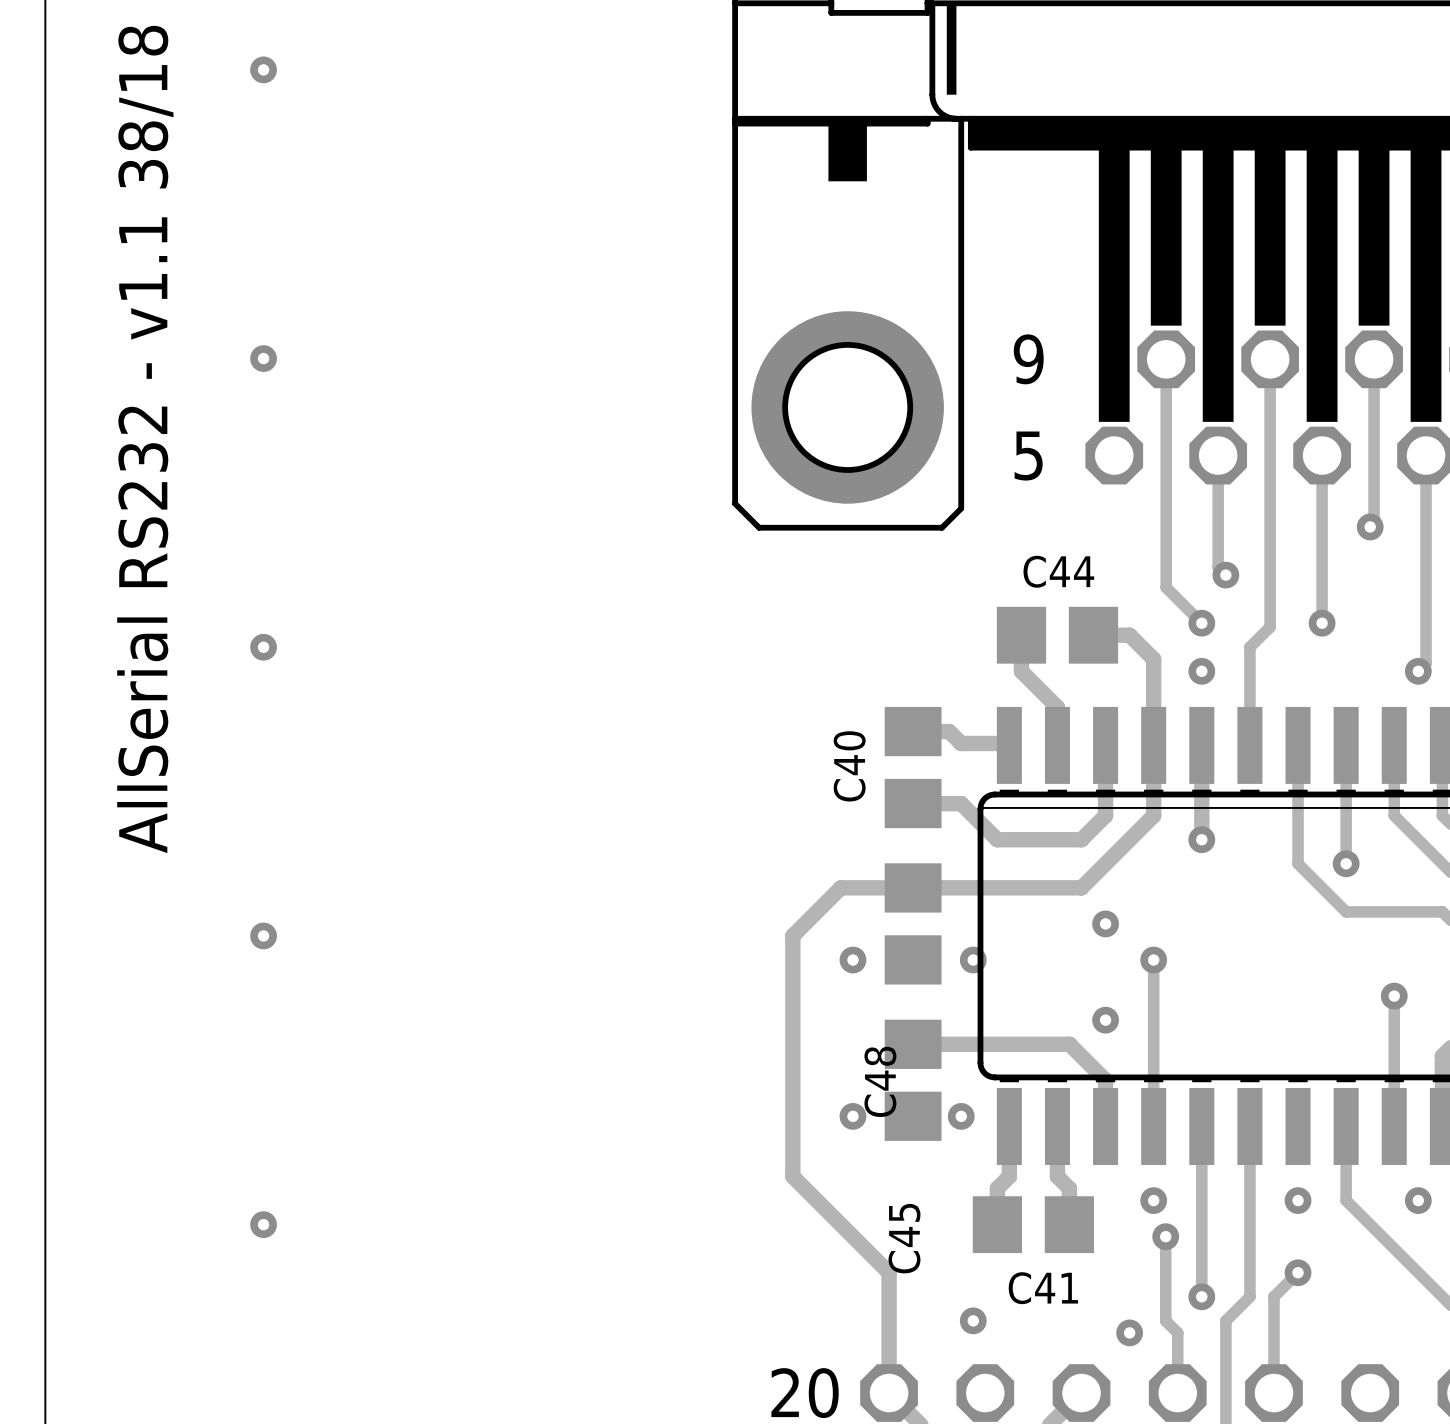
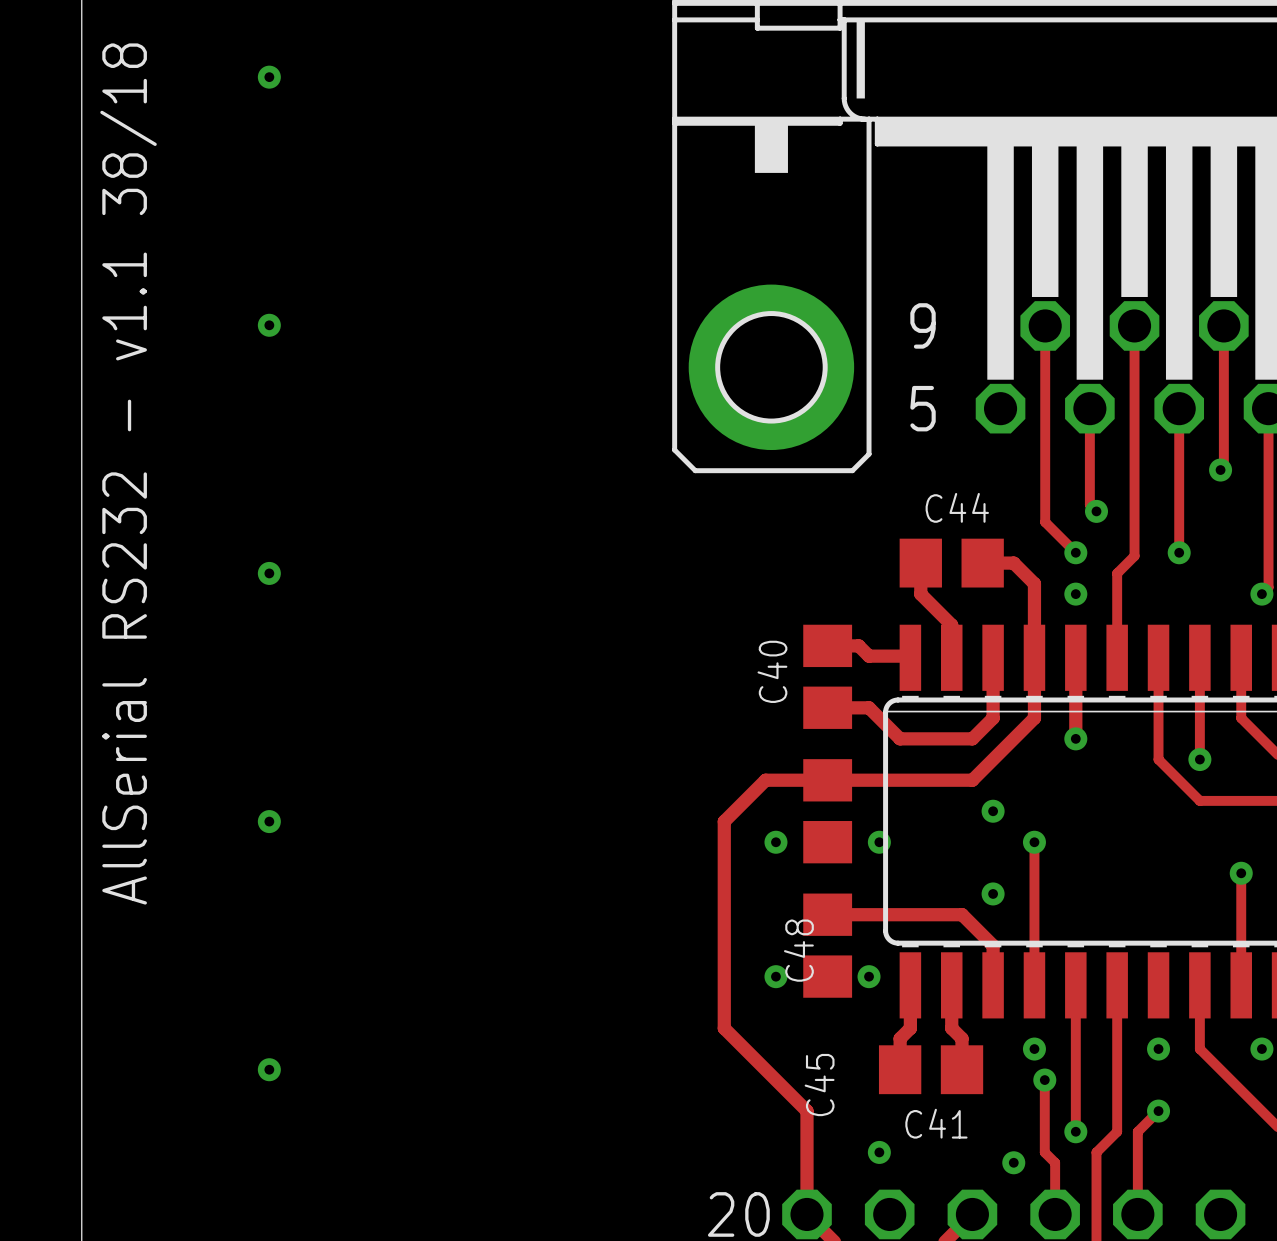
text position: AllSerial RS232 - v1.1 38/18 (145, 439) -> AllSerial RS232 - v1.1 38/18 (128, 473)

